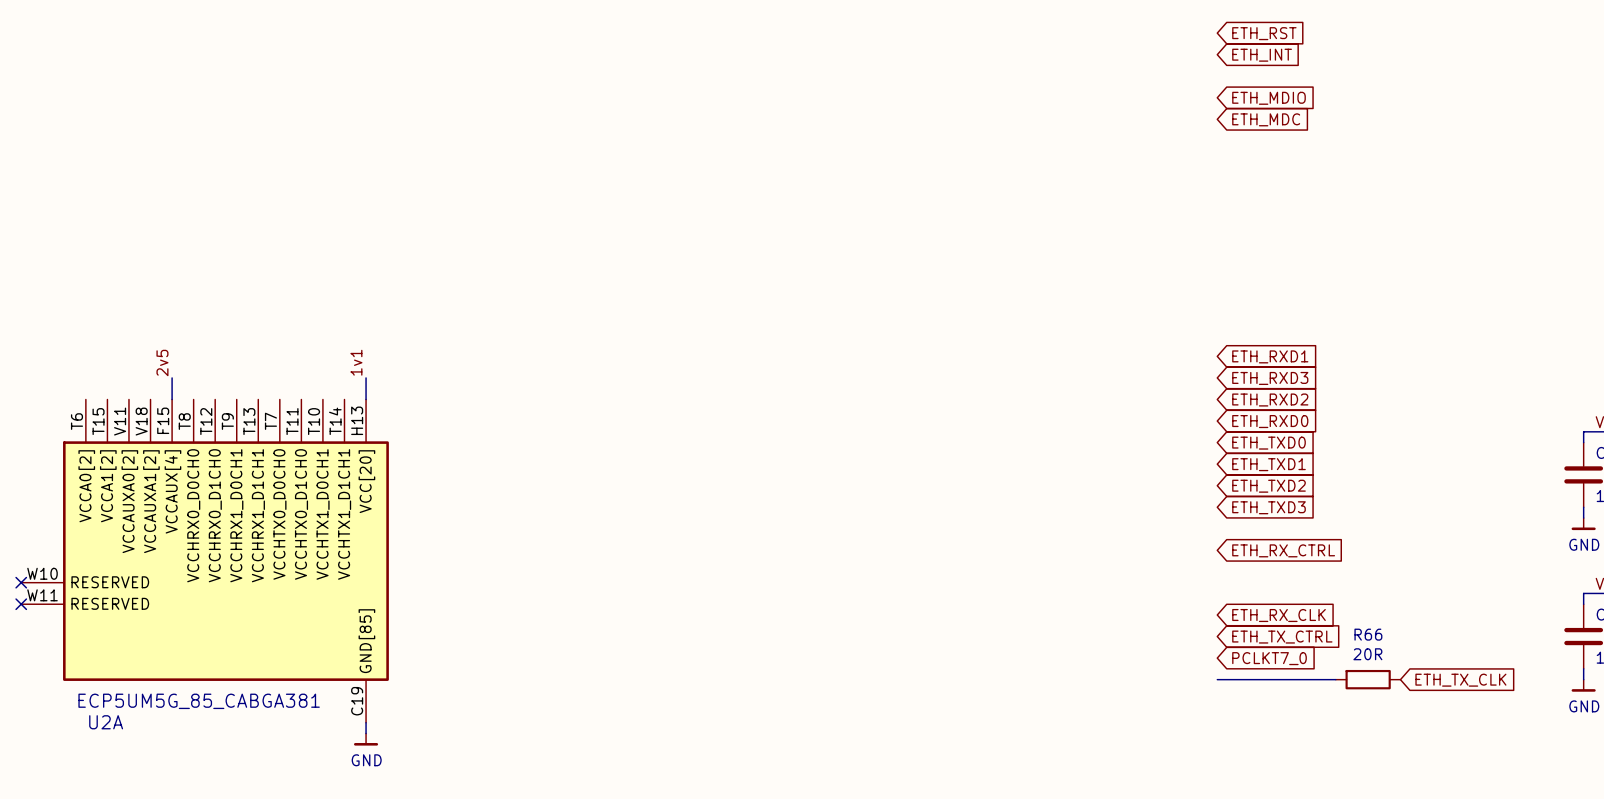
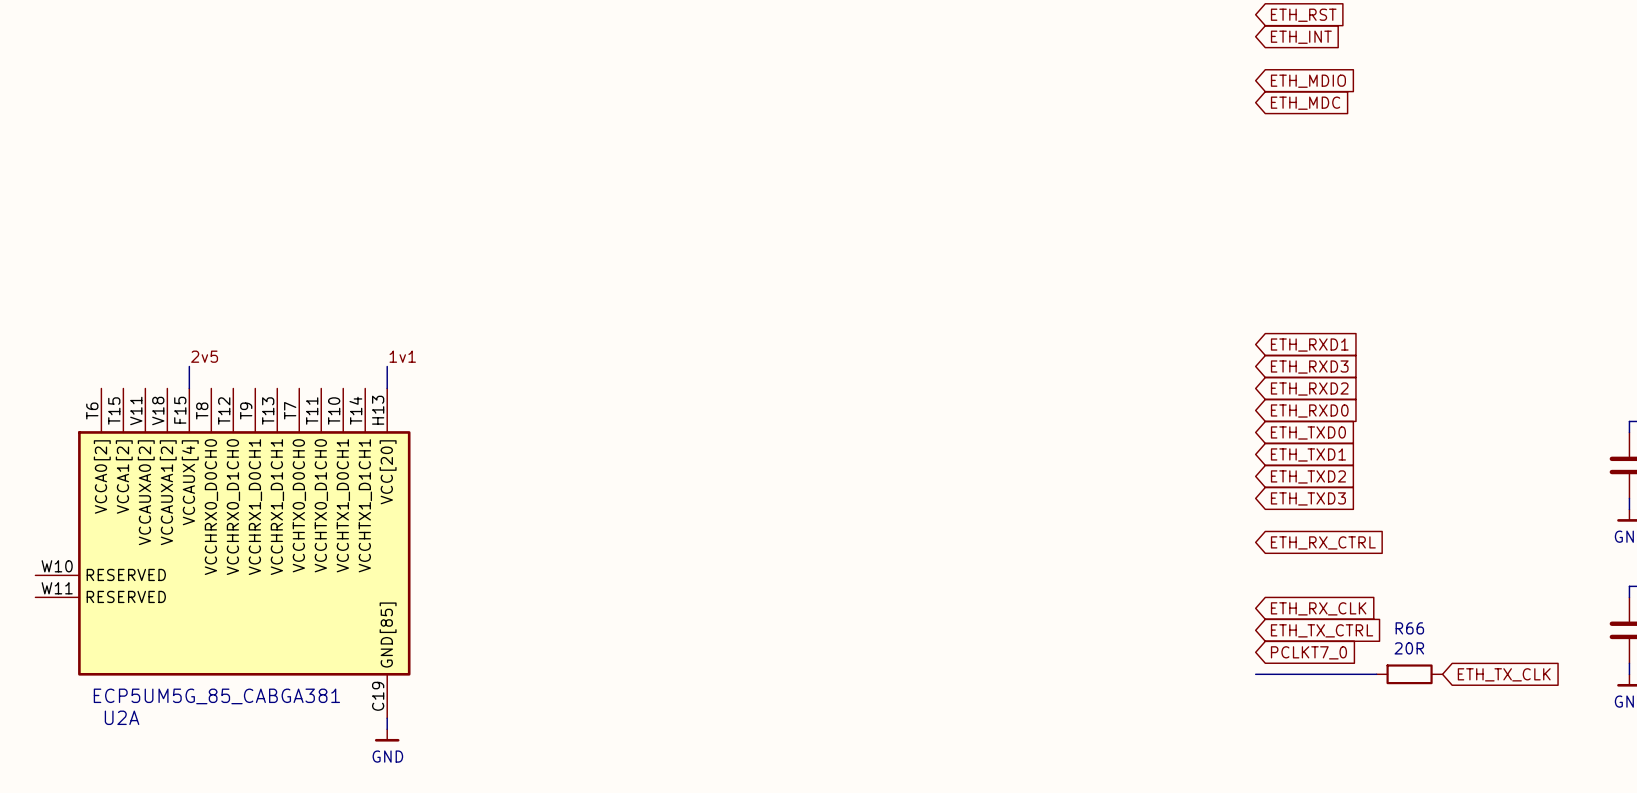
label rotation: 0° (162, 362) -> 90° clockwise (204, 356)
label rotation: 0° (356, 362) -> 90° clockwise (402, 356)
no-connect mark: (21, 582) -> none
no-connect mark: (21, 604) -> none

